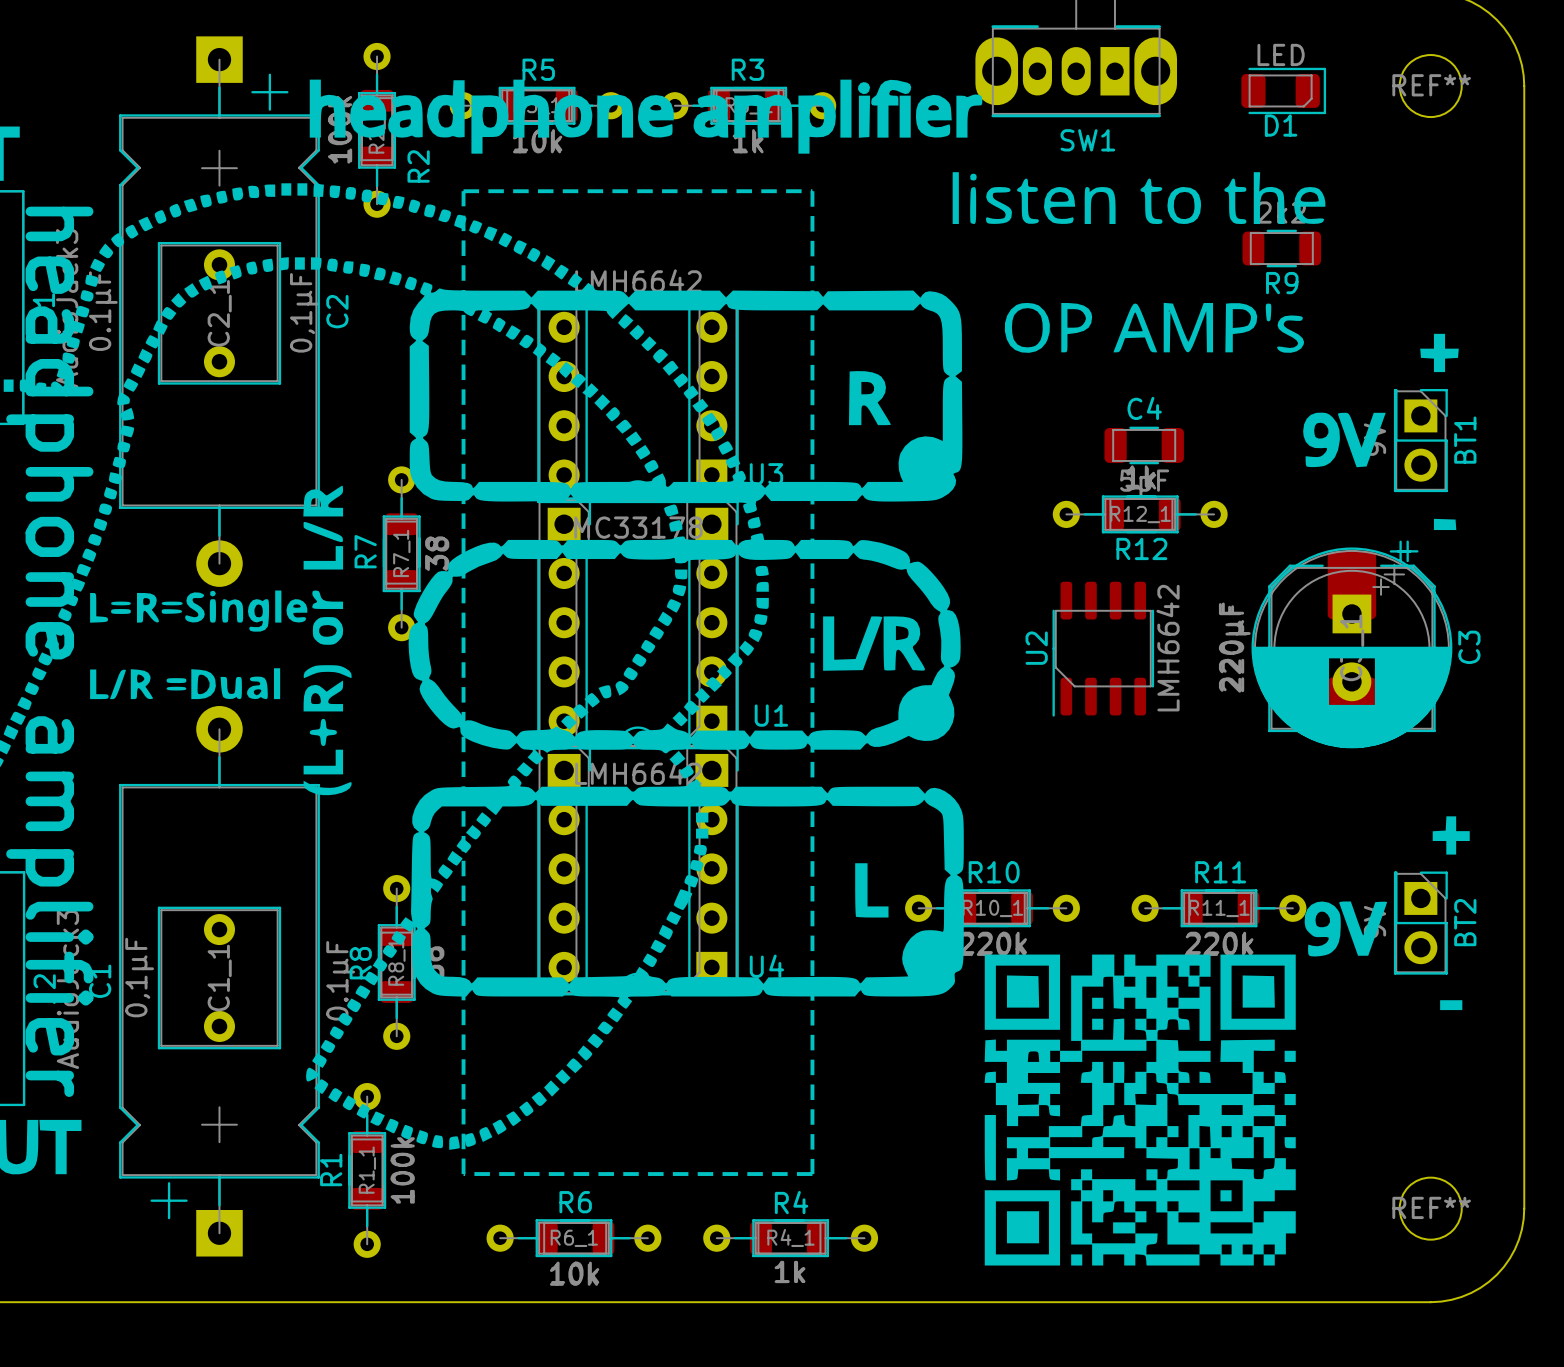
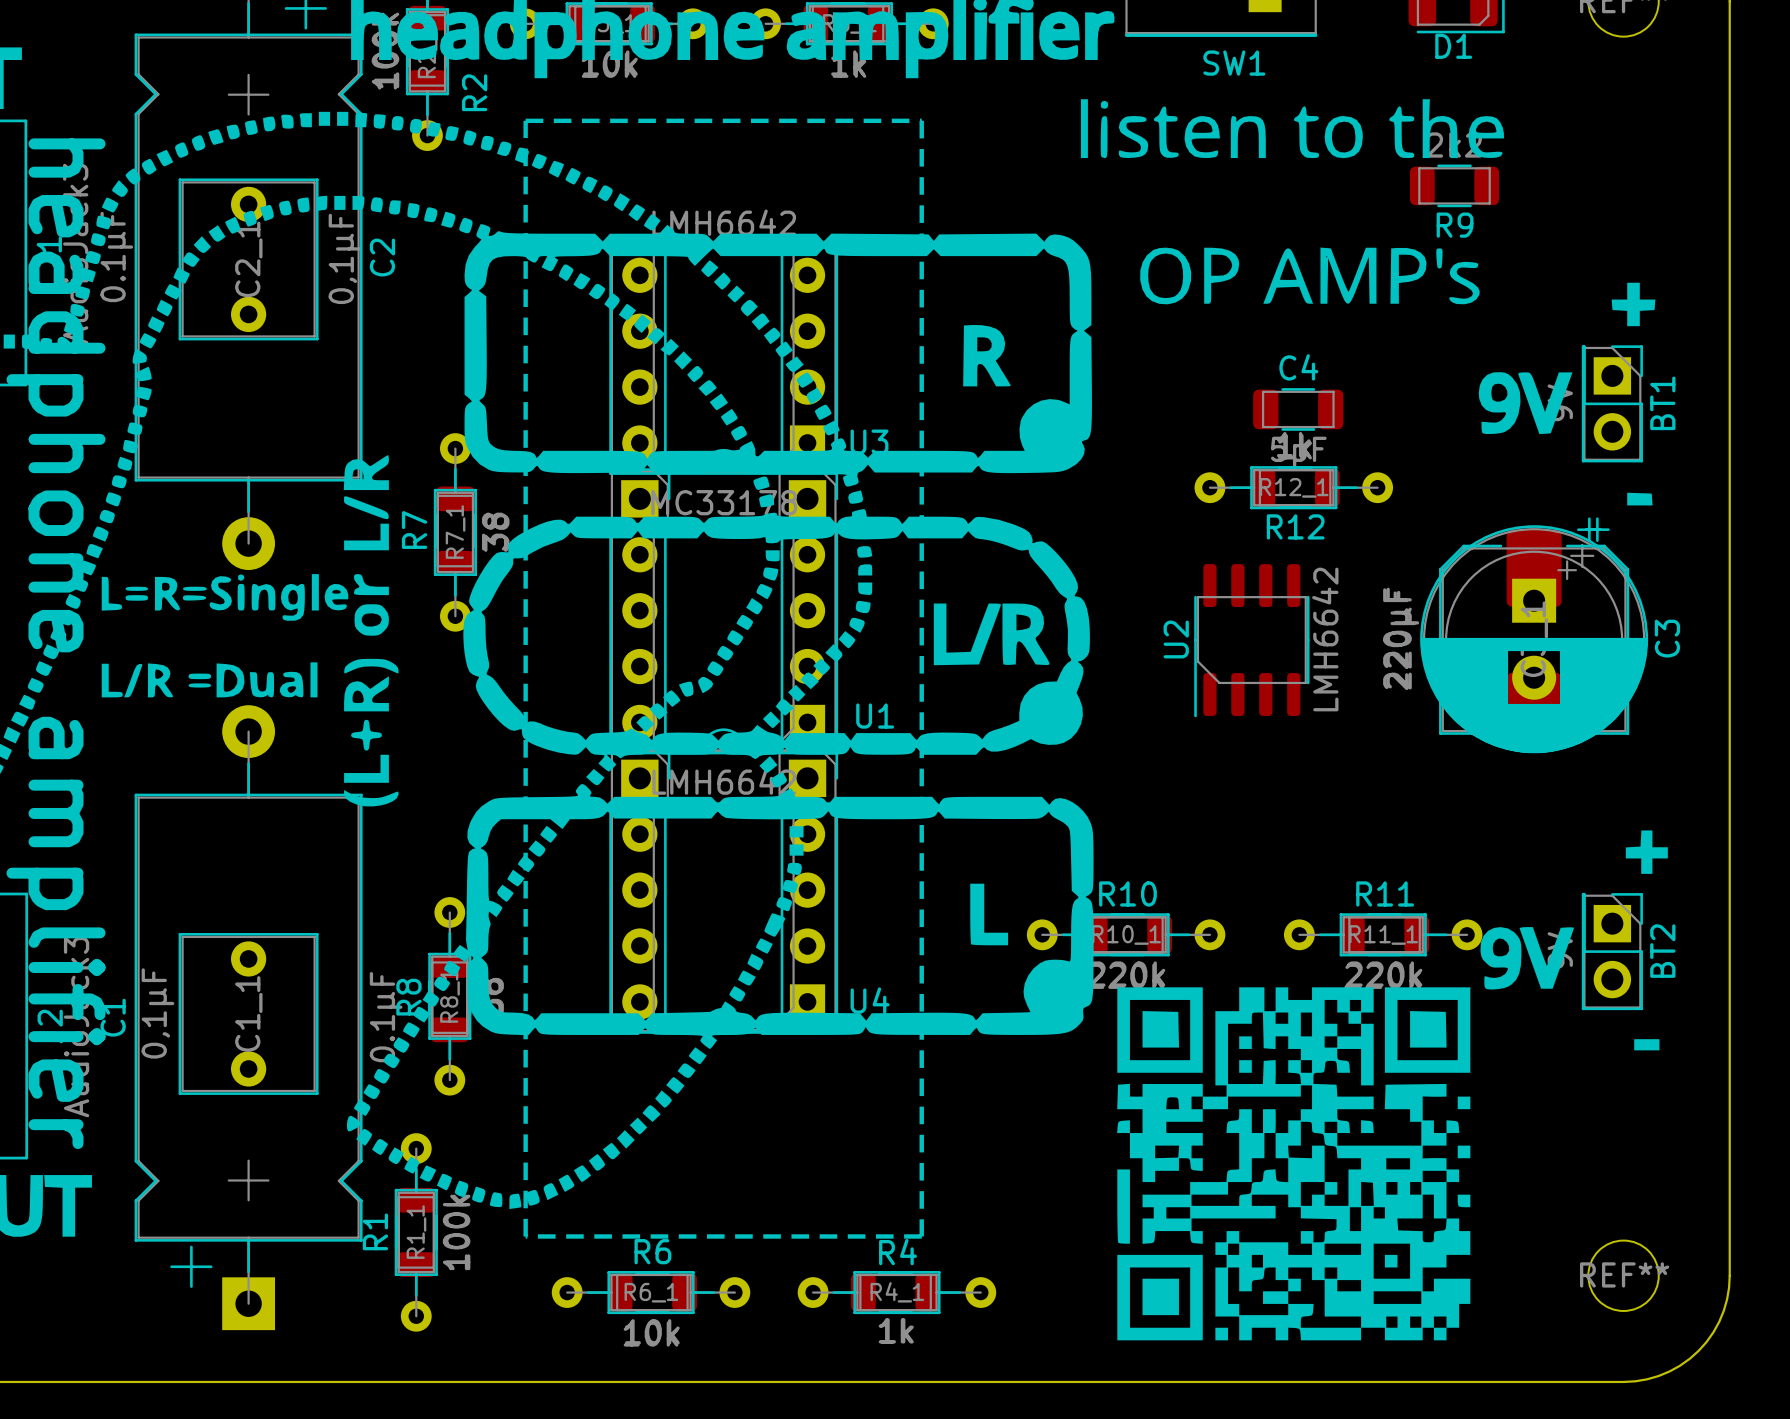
R6_1 position: (573, 1238) -> (651, 1292)
R6 position: (575, 1238) -> (652, 1292)
R4 position: (789, 1238) -> (895, 1292)
R4_1 position: (790, 1238) -> (896, 1292)

